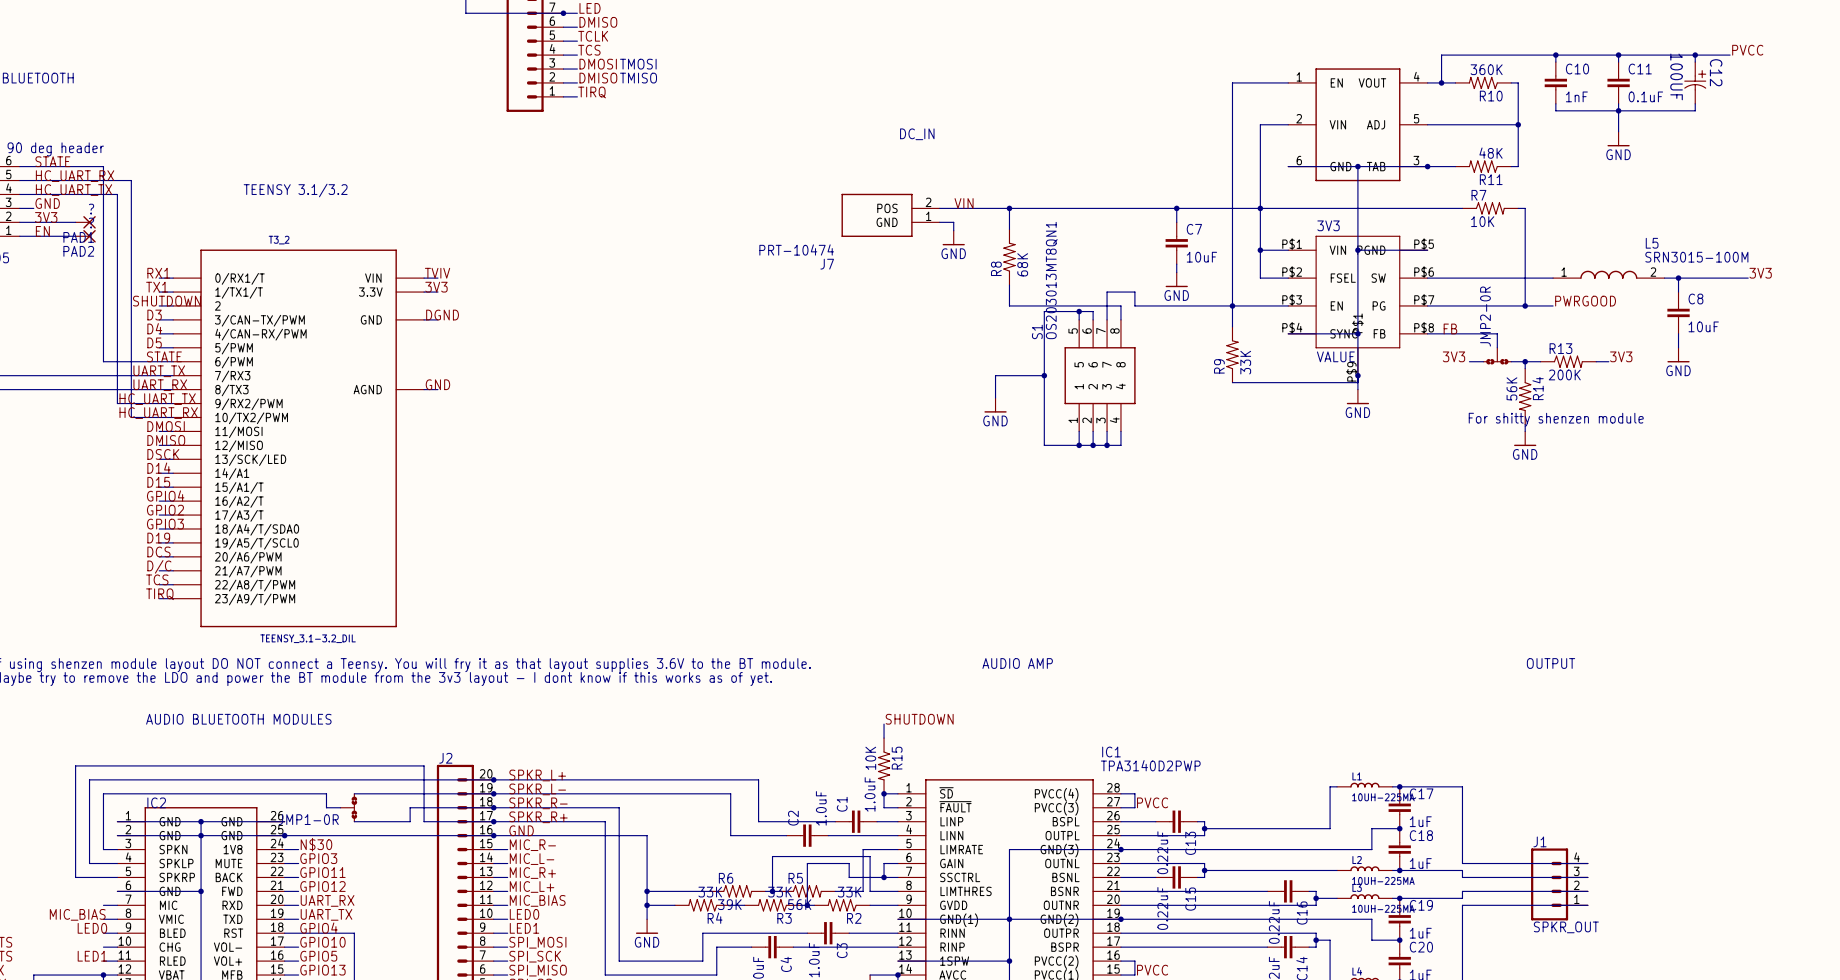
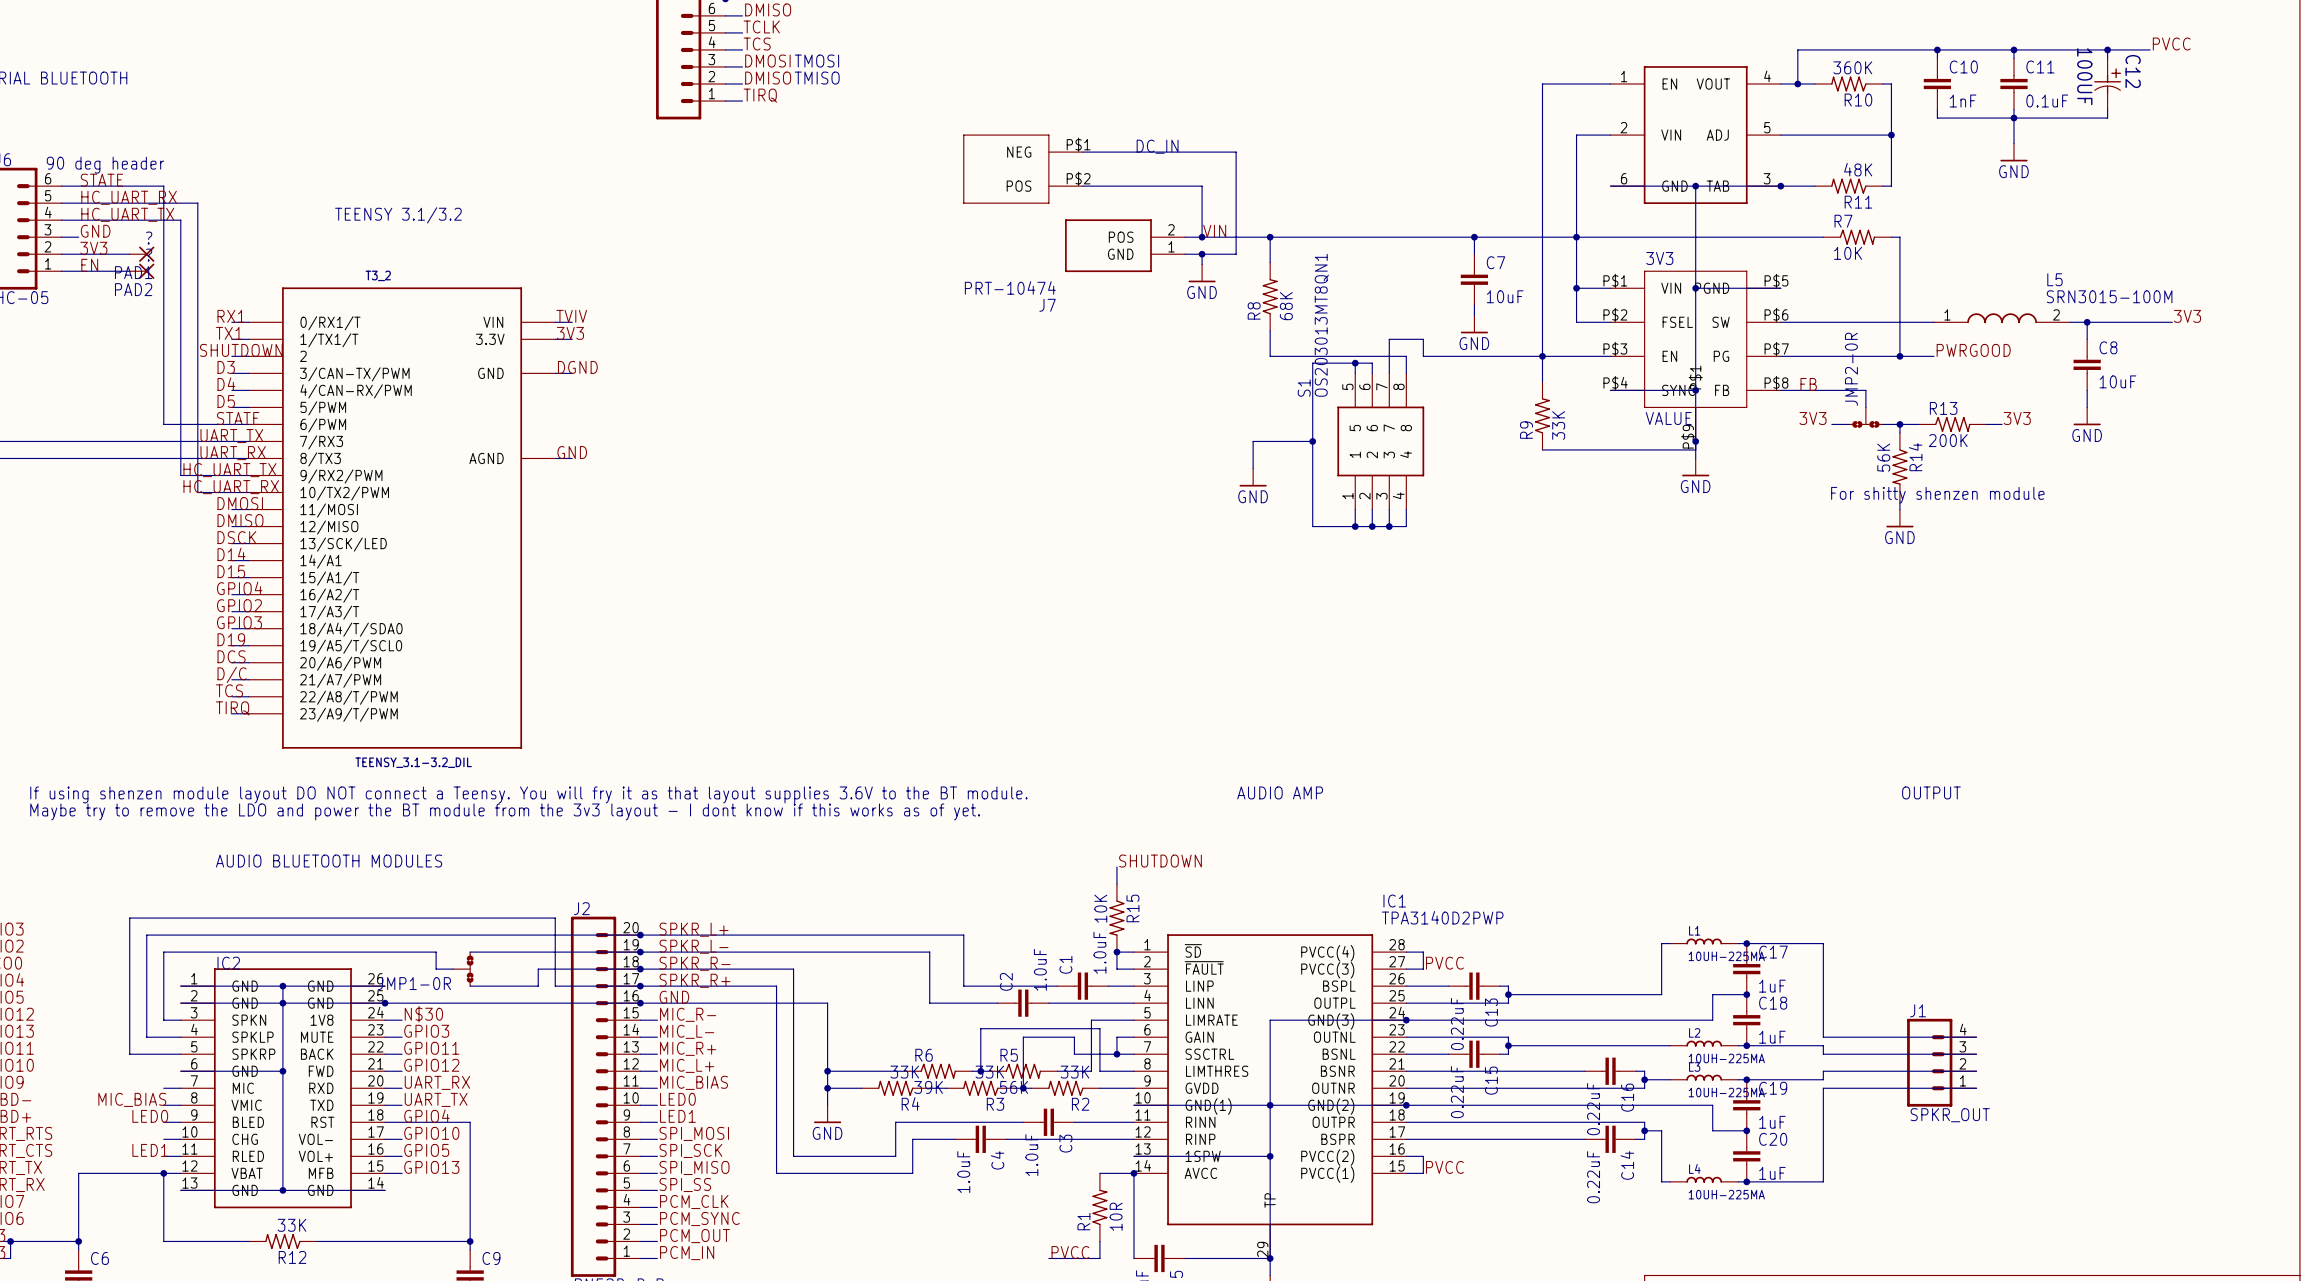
wire: none -> (1082, 152) (1236, 152) (1236, 254) (1202, 254)
part: none -> (1023, 169)
wire: none -> (1082, 186) (1202, 186) (1202, 237)
junction: none -> (1202, 237)
junction: none -> (1202, 254)

